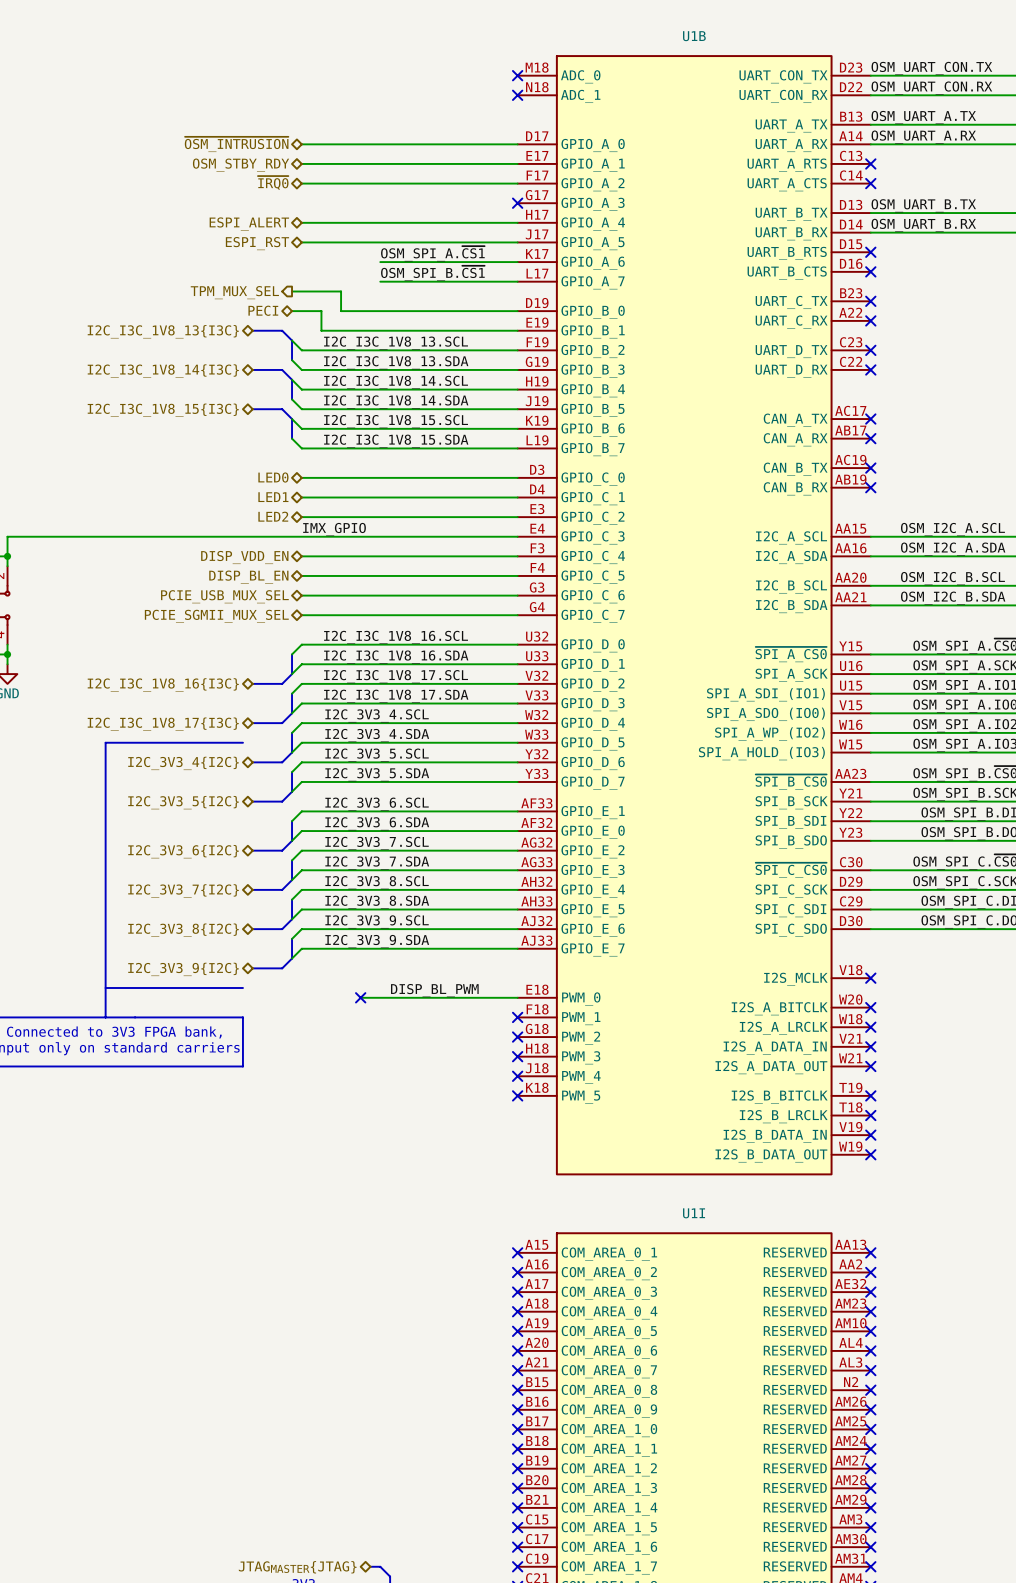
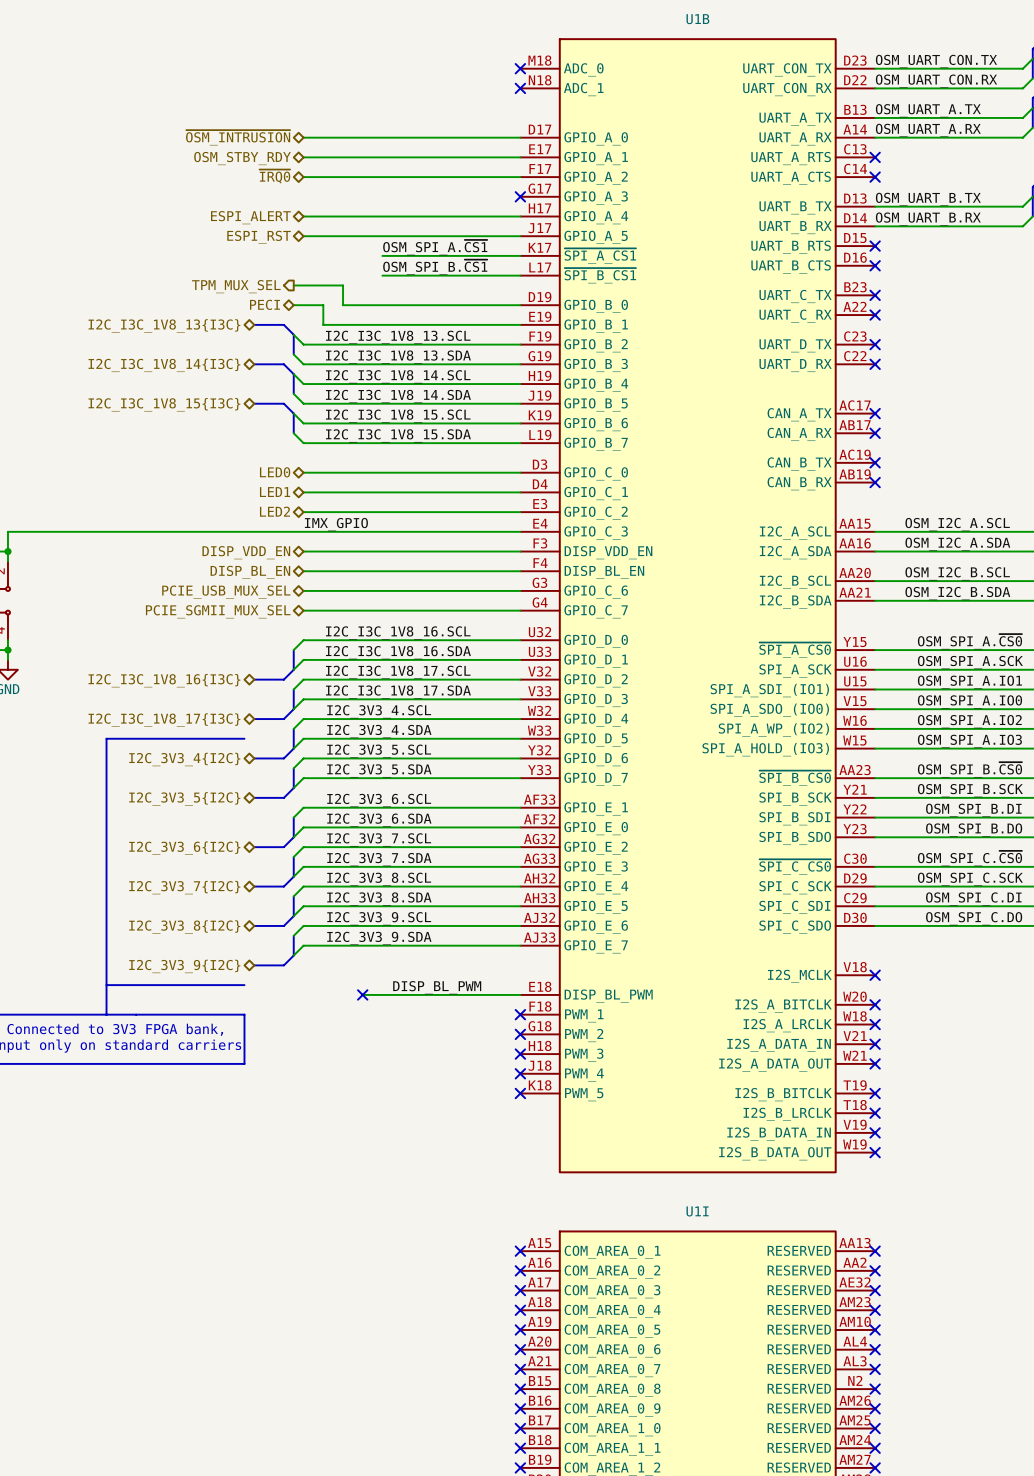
U1B symbol: [517, 55, 871, 1176] -> [520, 38, 876, 1174]

